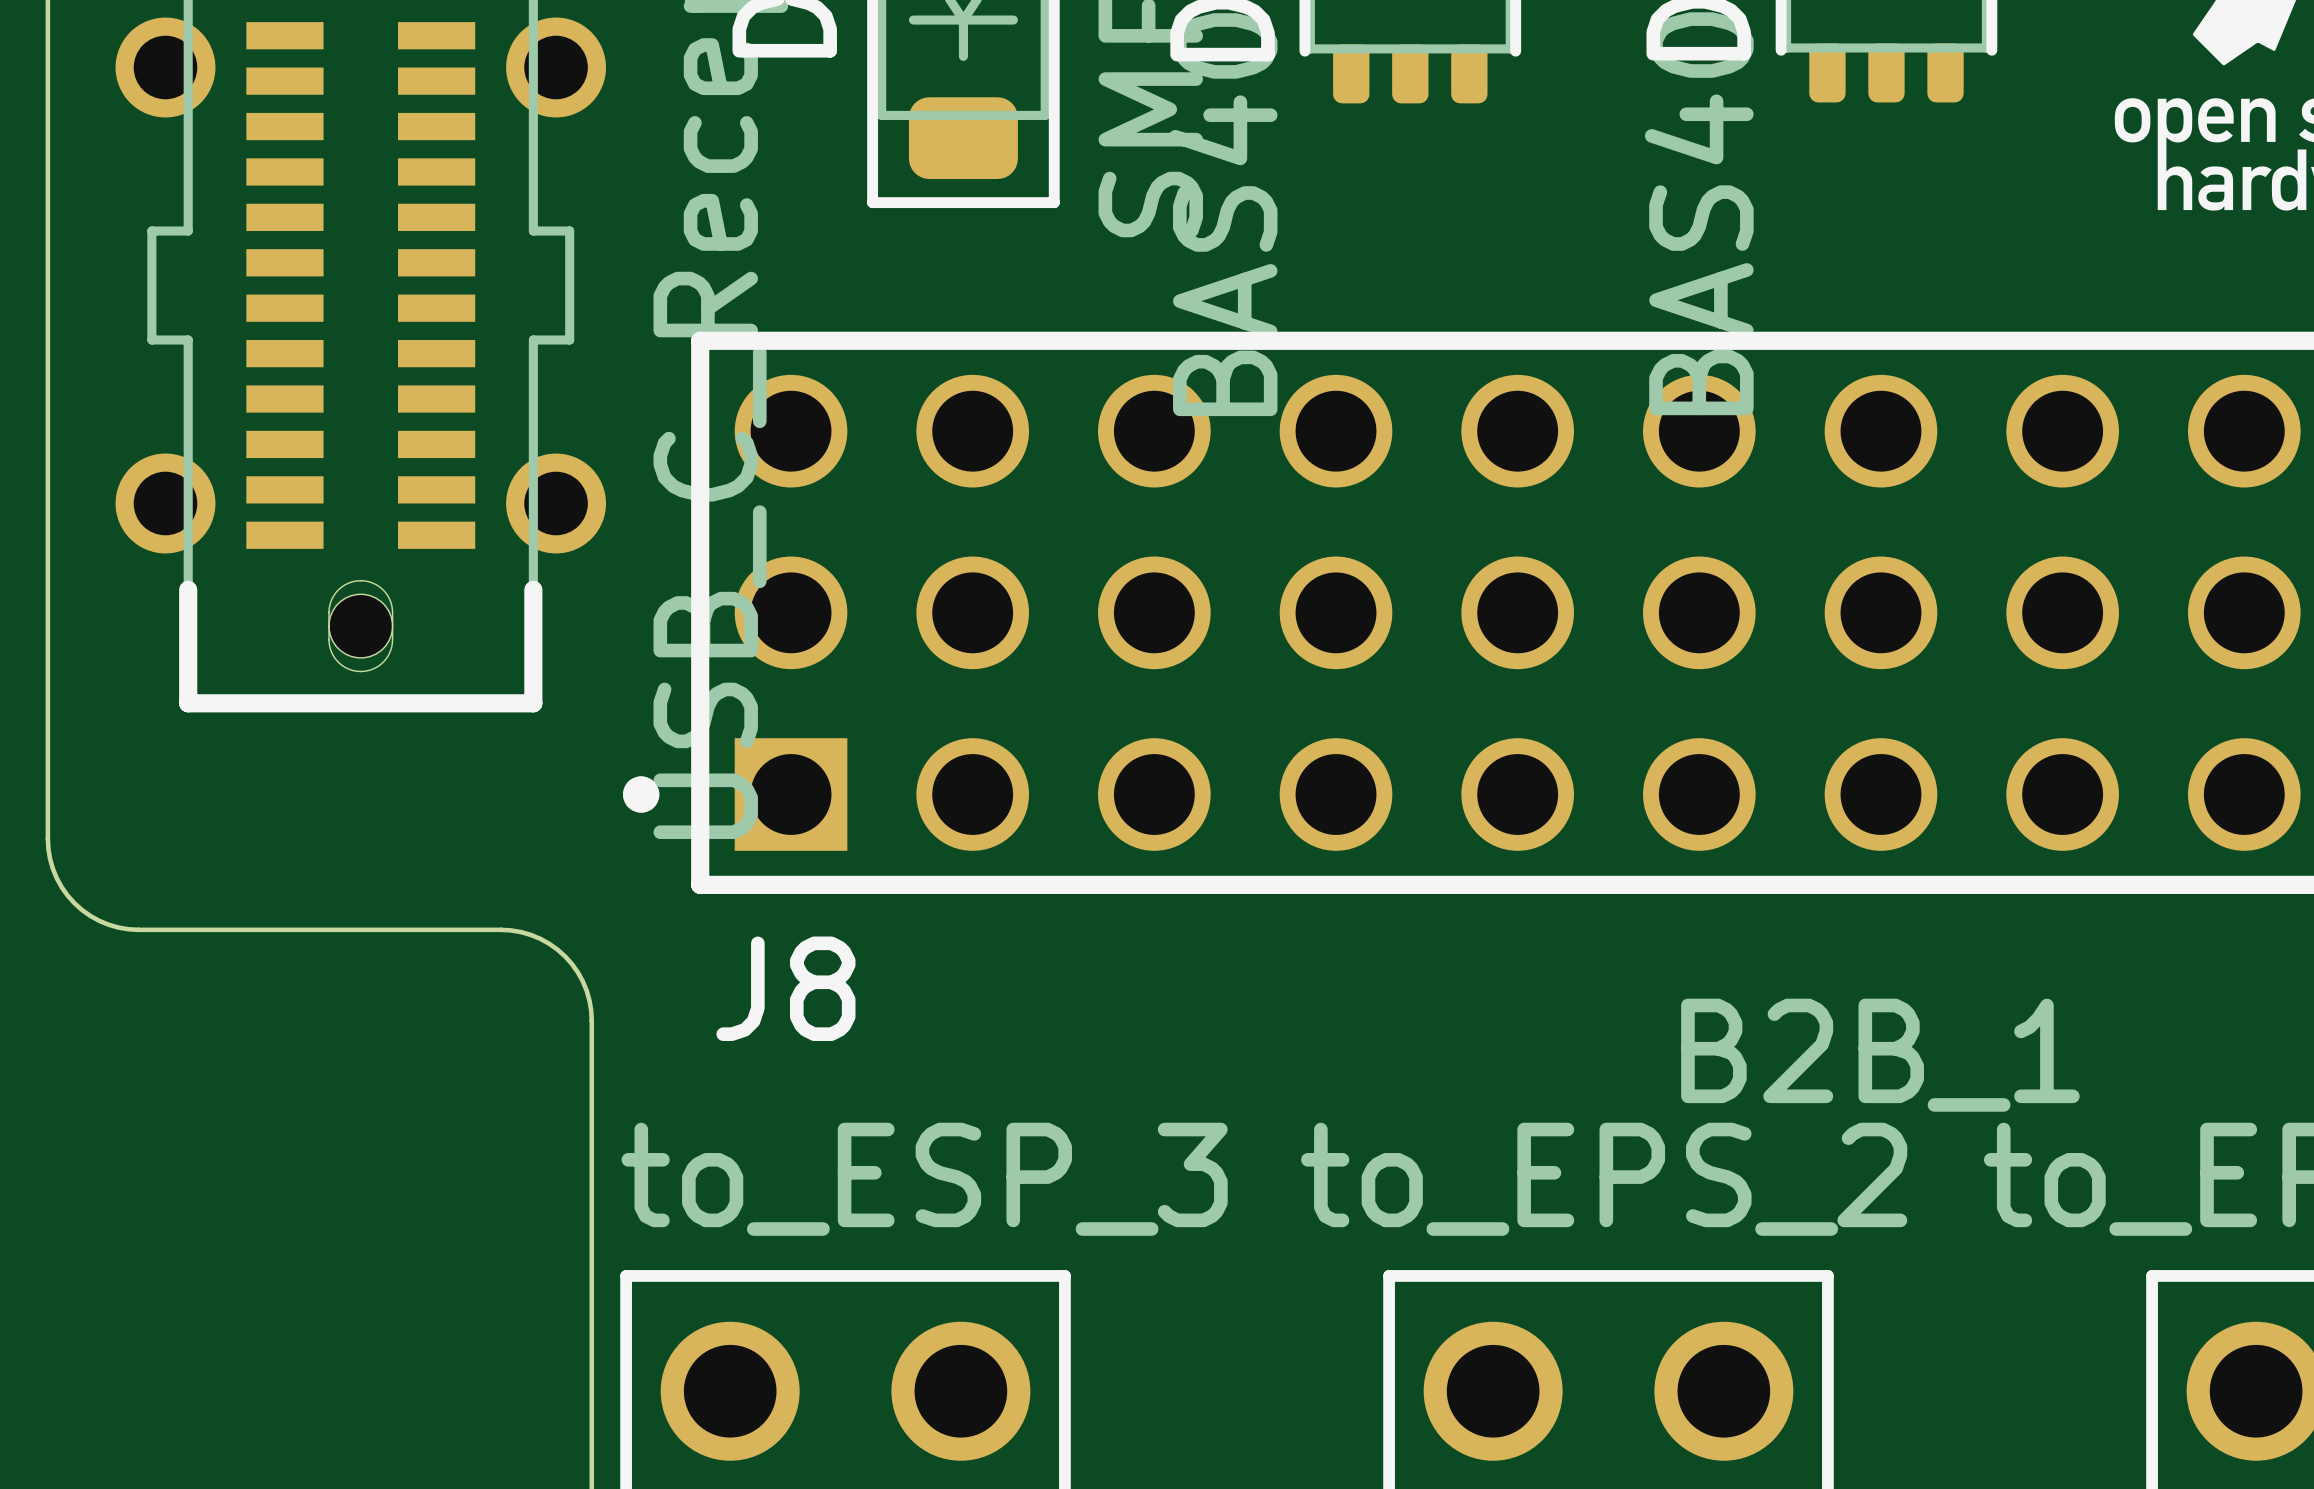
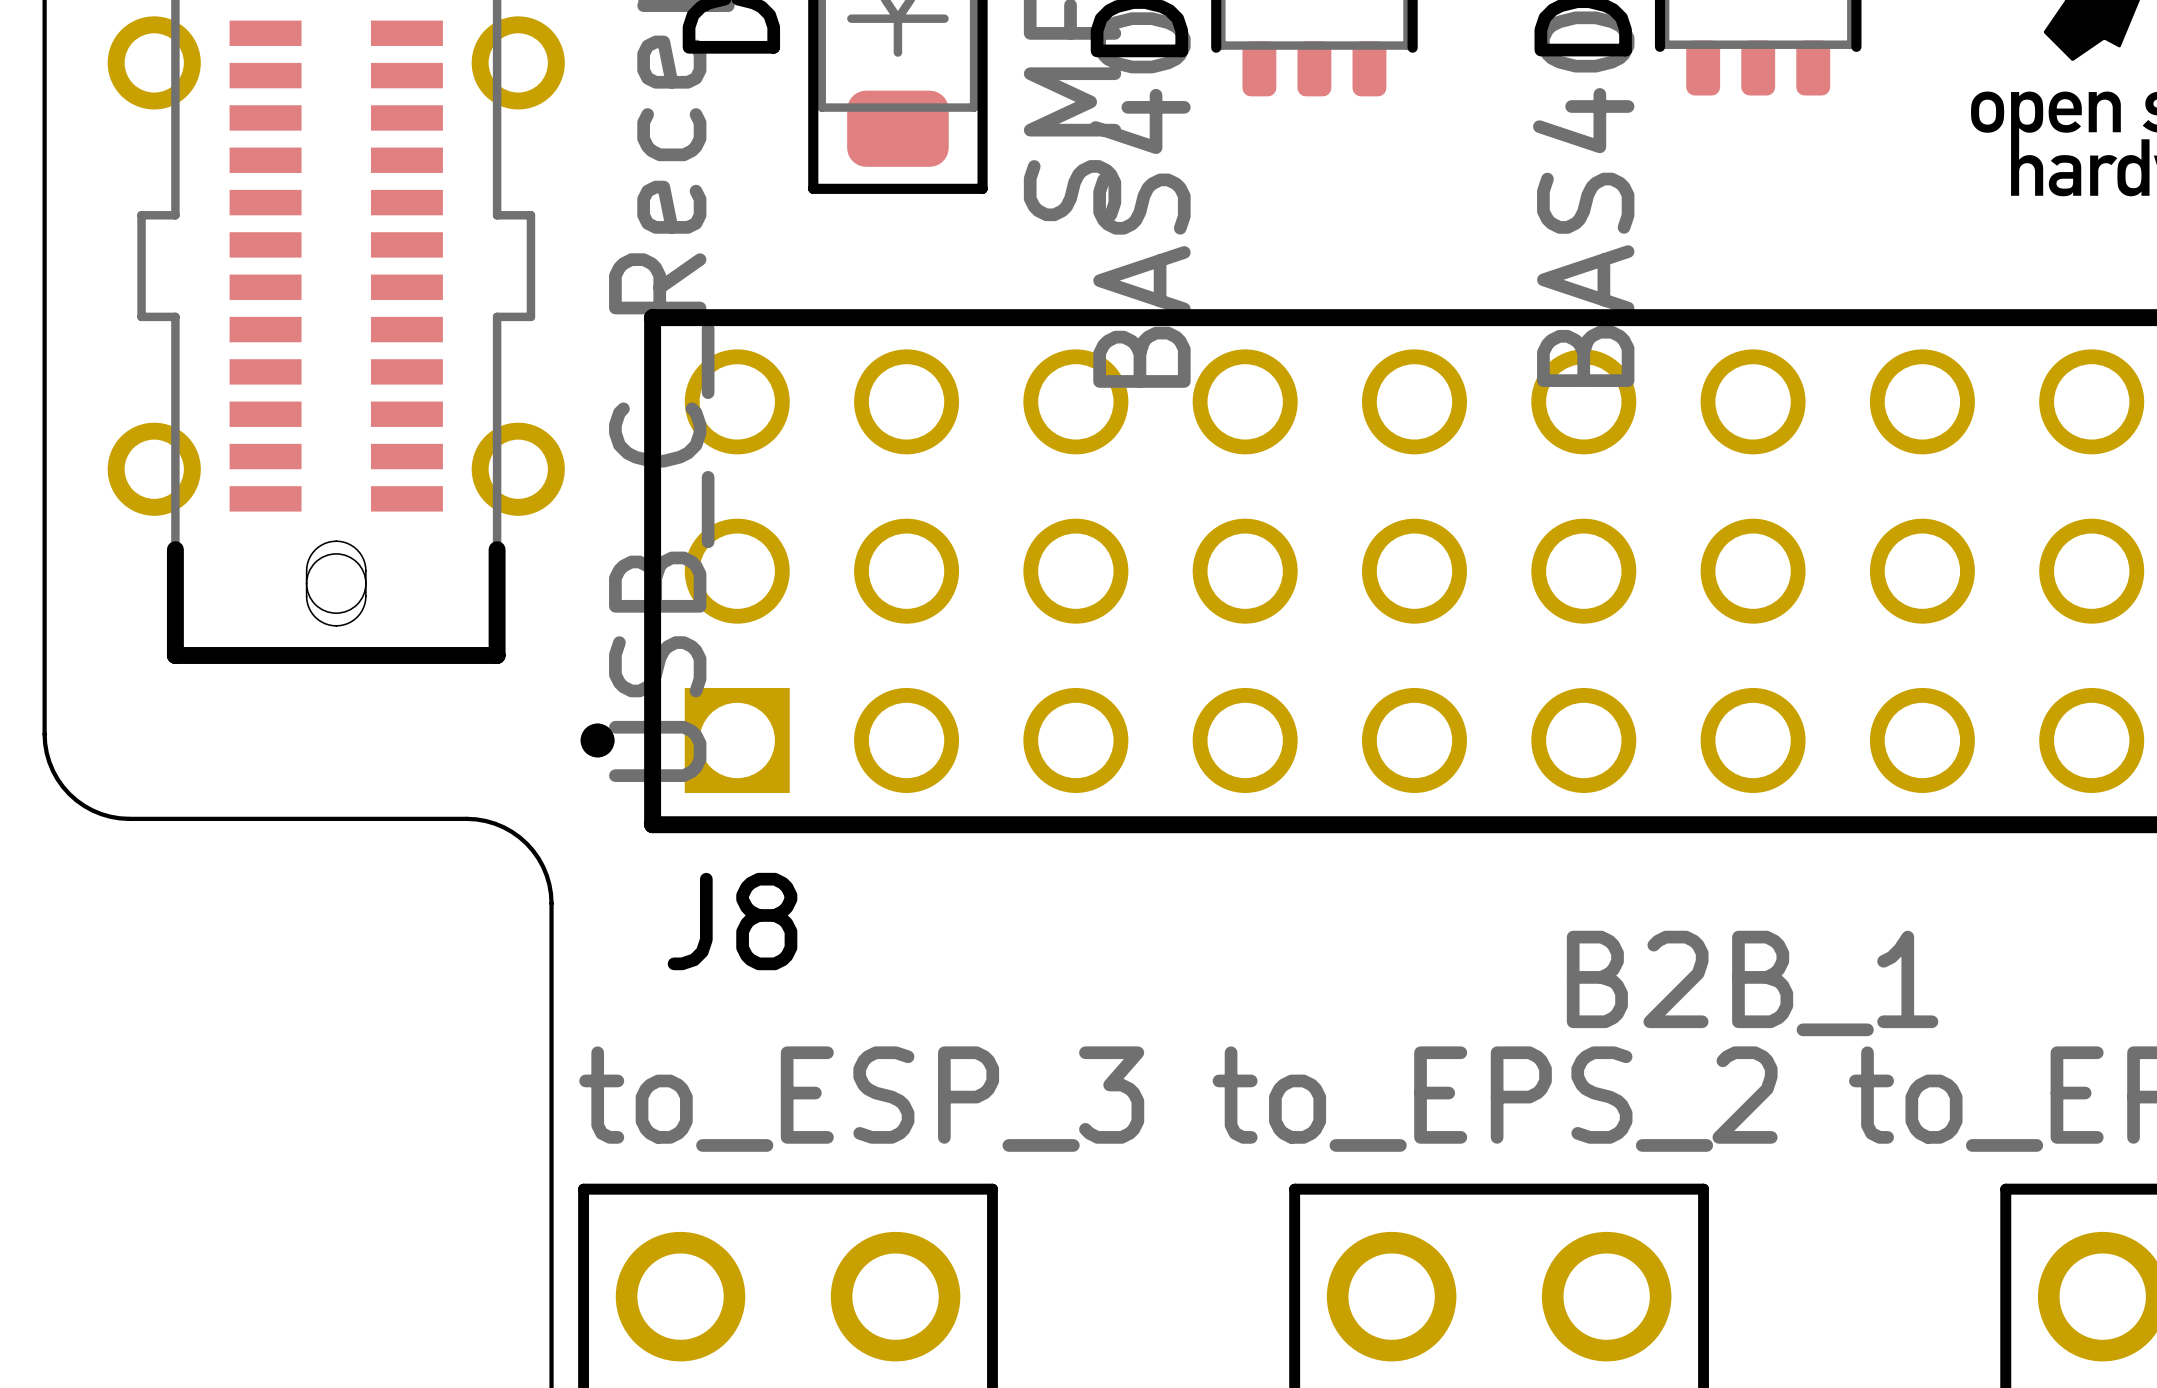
board edge: (47, 787) (48, 849) (52, 869) (61, 887) (74, 903) (99, 920) (118, 927) (138, 929) (500, 929) (521, 932) (549, 943) (571, 964) (586, 990) (591, 1020) -> (44, 734) (49, 762) (63, 787) (84, 805) (110, 816) (129, 818) (466, 818) (485, 820) (503, 827) (519, 837) (533, 850) (546, 875) (550, 894) (551, 951)

